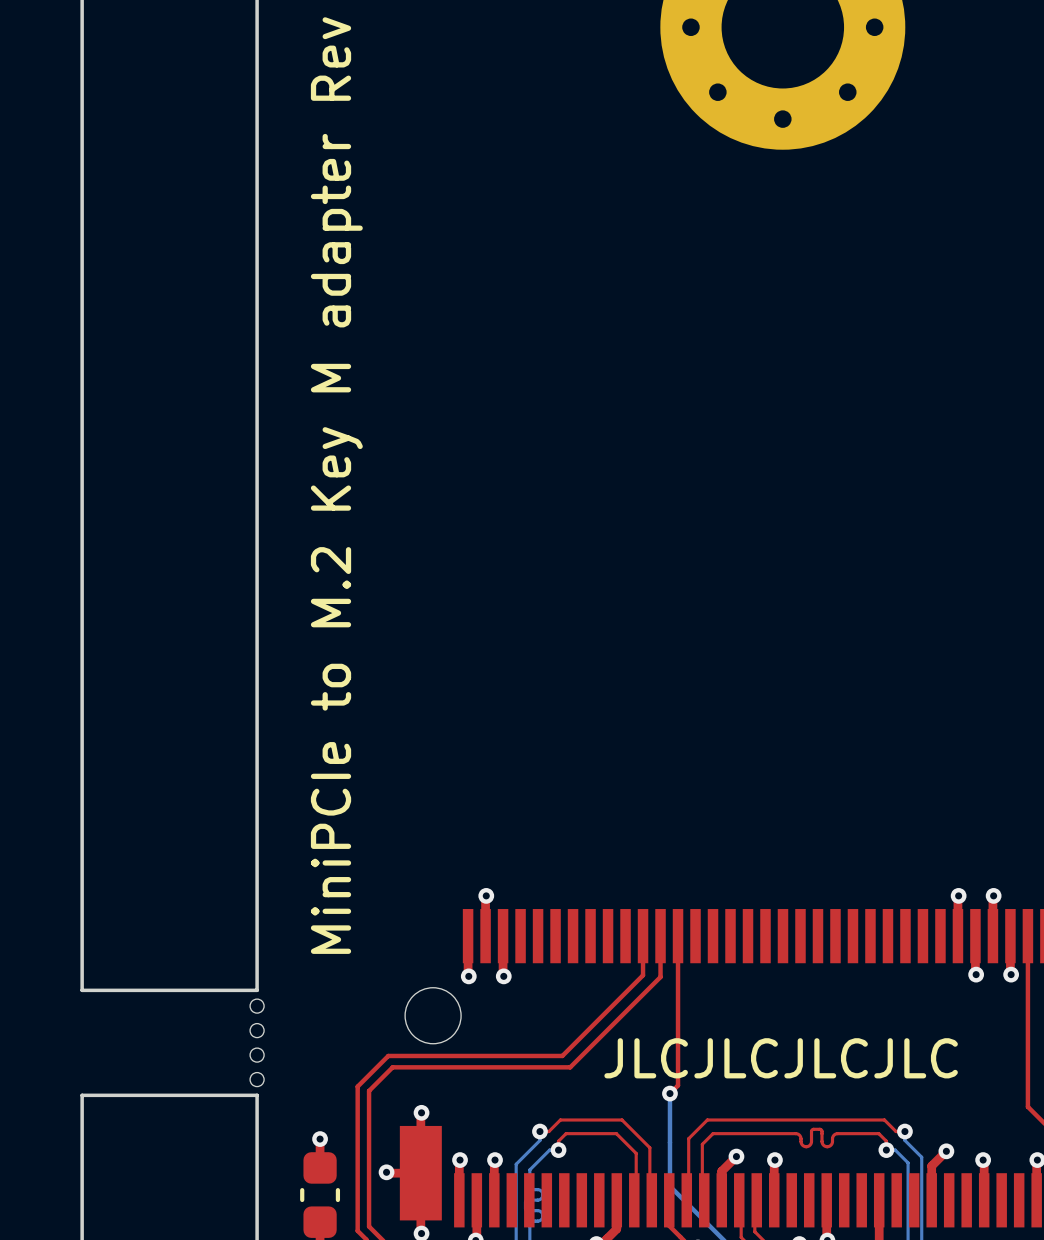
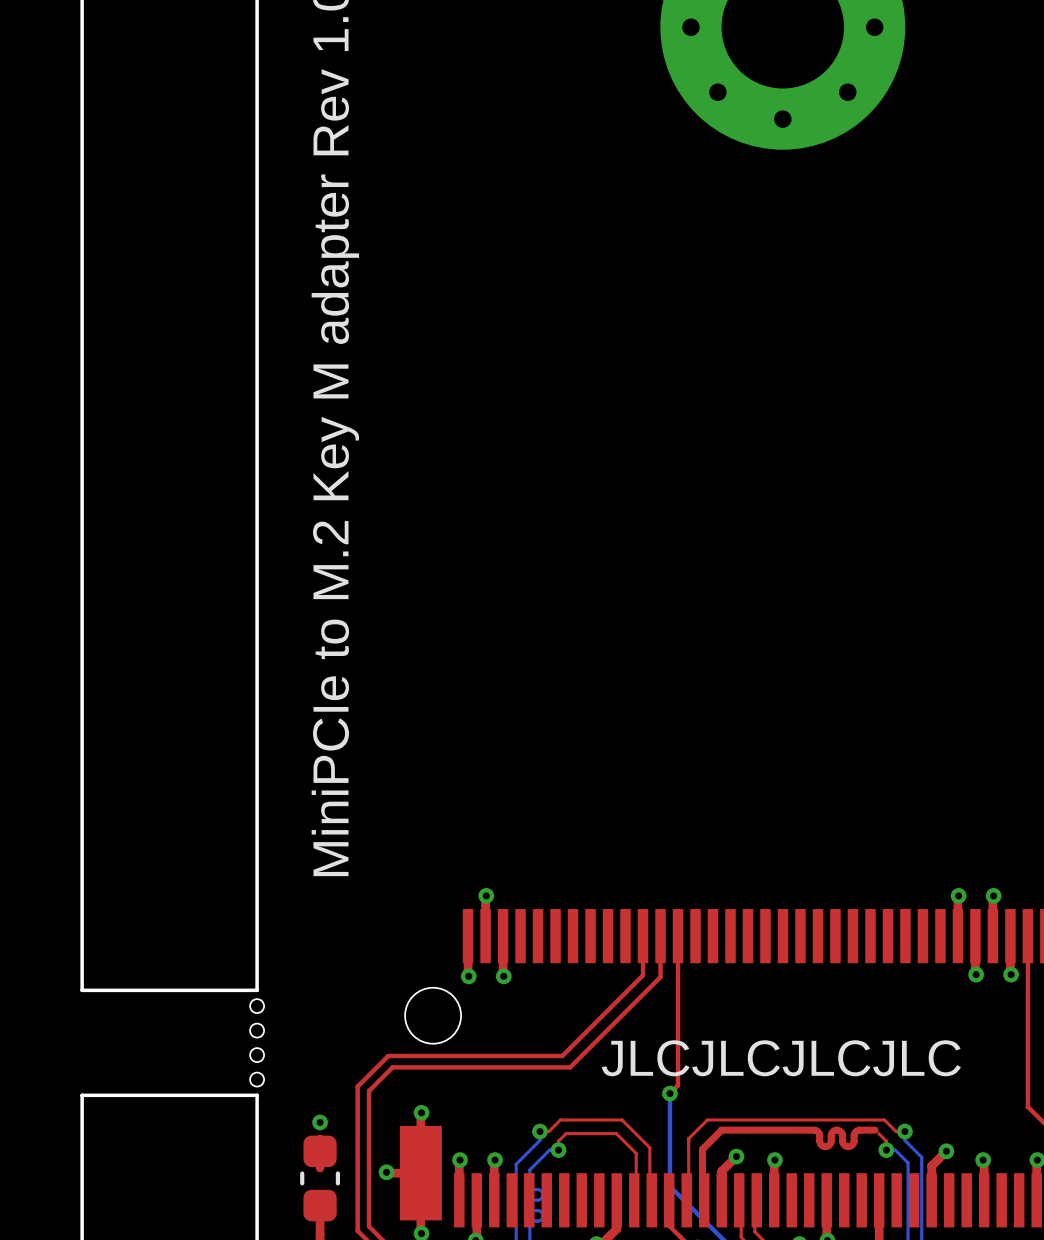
top track: (878, 1133) (836, 1133) (832, 1136) (831, 1144) (827, 1146) (822, 1143) (821, 1131) (820, 1129) (811, 1130) (811, 1143) (806, 1146) (802, 1144) (800, 1136) (796, 1133) (713, 1133) (702, 1144) (702, 1176) -> (875, 1130) (856, 1131) (854, 1134) (853, 1143) (848, 1146) (843, 1143) (842, 1133) (837, 1130) (832, 1132) (830, 1143) (825, 1146) (820, 1143) (819, 1133) (814, 1130) (721, 1130) (702, 1149) (702, 1176)
via position: (320, 1139) -> (320, 1122)
part position: (320, 1195) -> (320, 1178)

